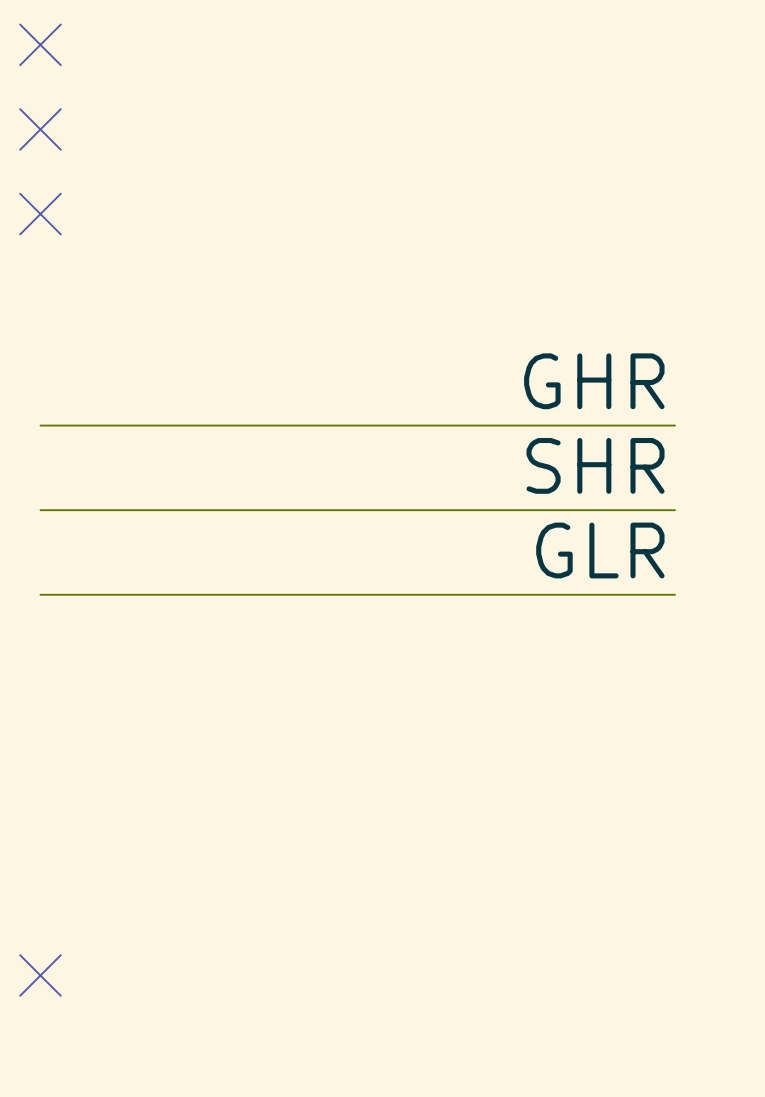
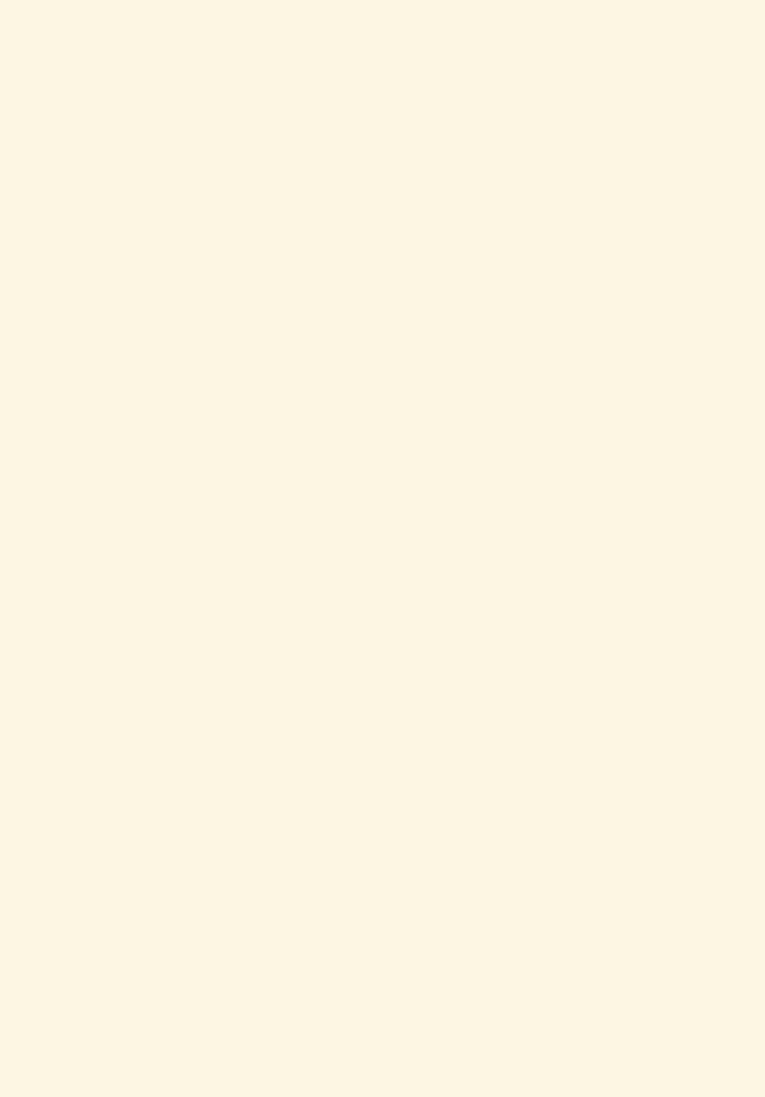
no-connect mark: (40, 44) -> none
no-connect mark: (40, 129) -> none
no-connect mark: (40, 214) -> none
label: GHR (594, 381) -> none
wire: (40, 425) (675, 425) -> none
label: SHR (595, 465) -> none
wire: (40, 510) (675, 510) -> none
label: GLR (600, 550) -> none
wire: (40, 594) (675, 594) -> none
no-connect mark: (40, 975) -> none

